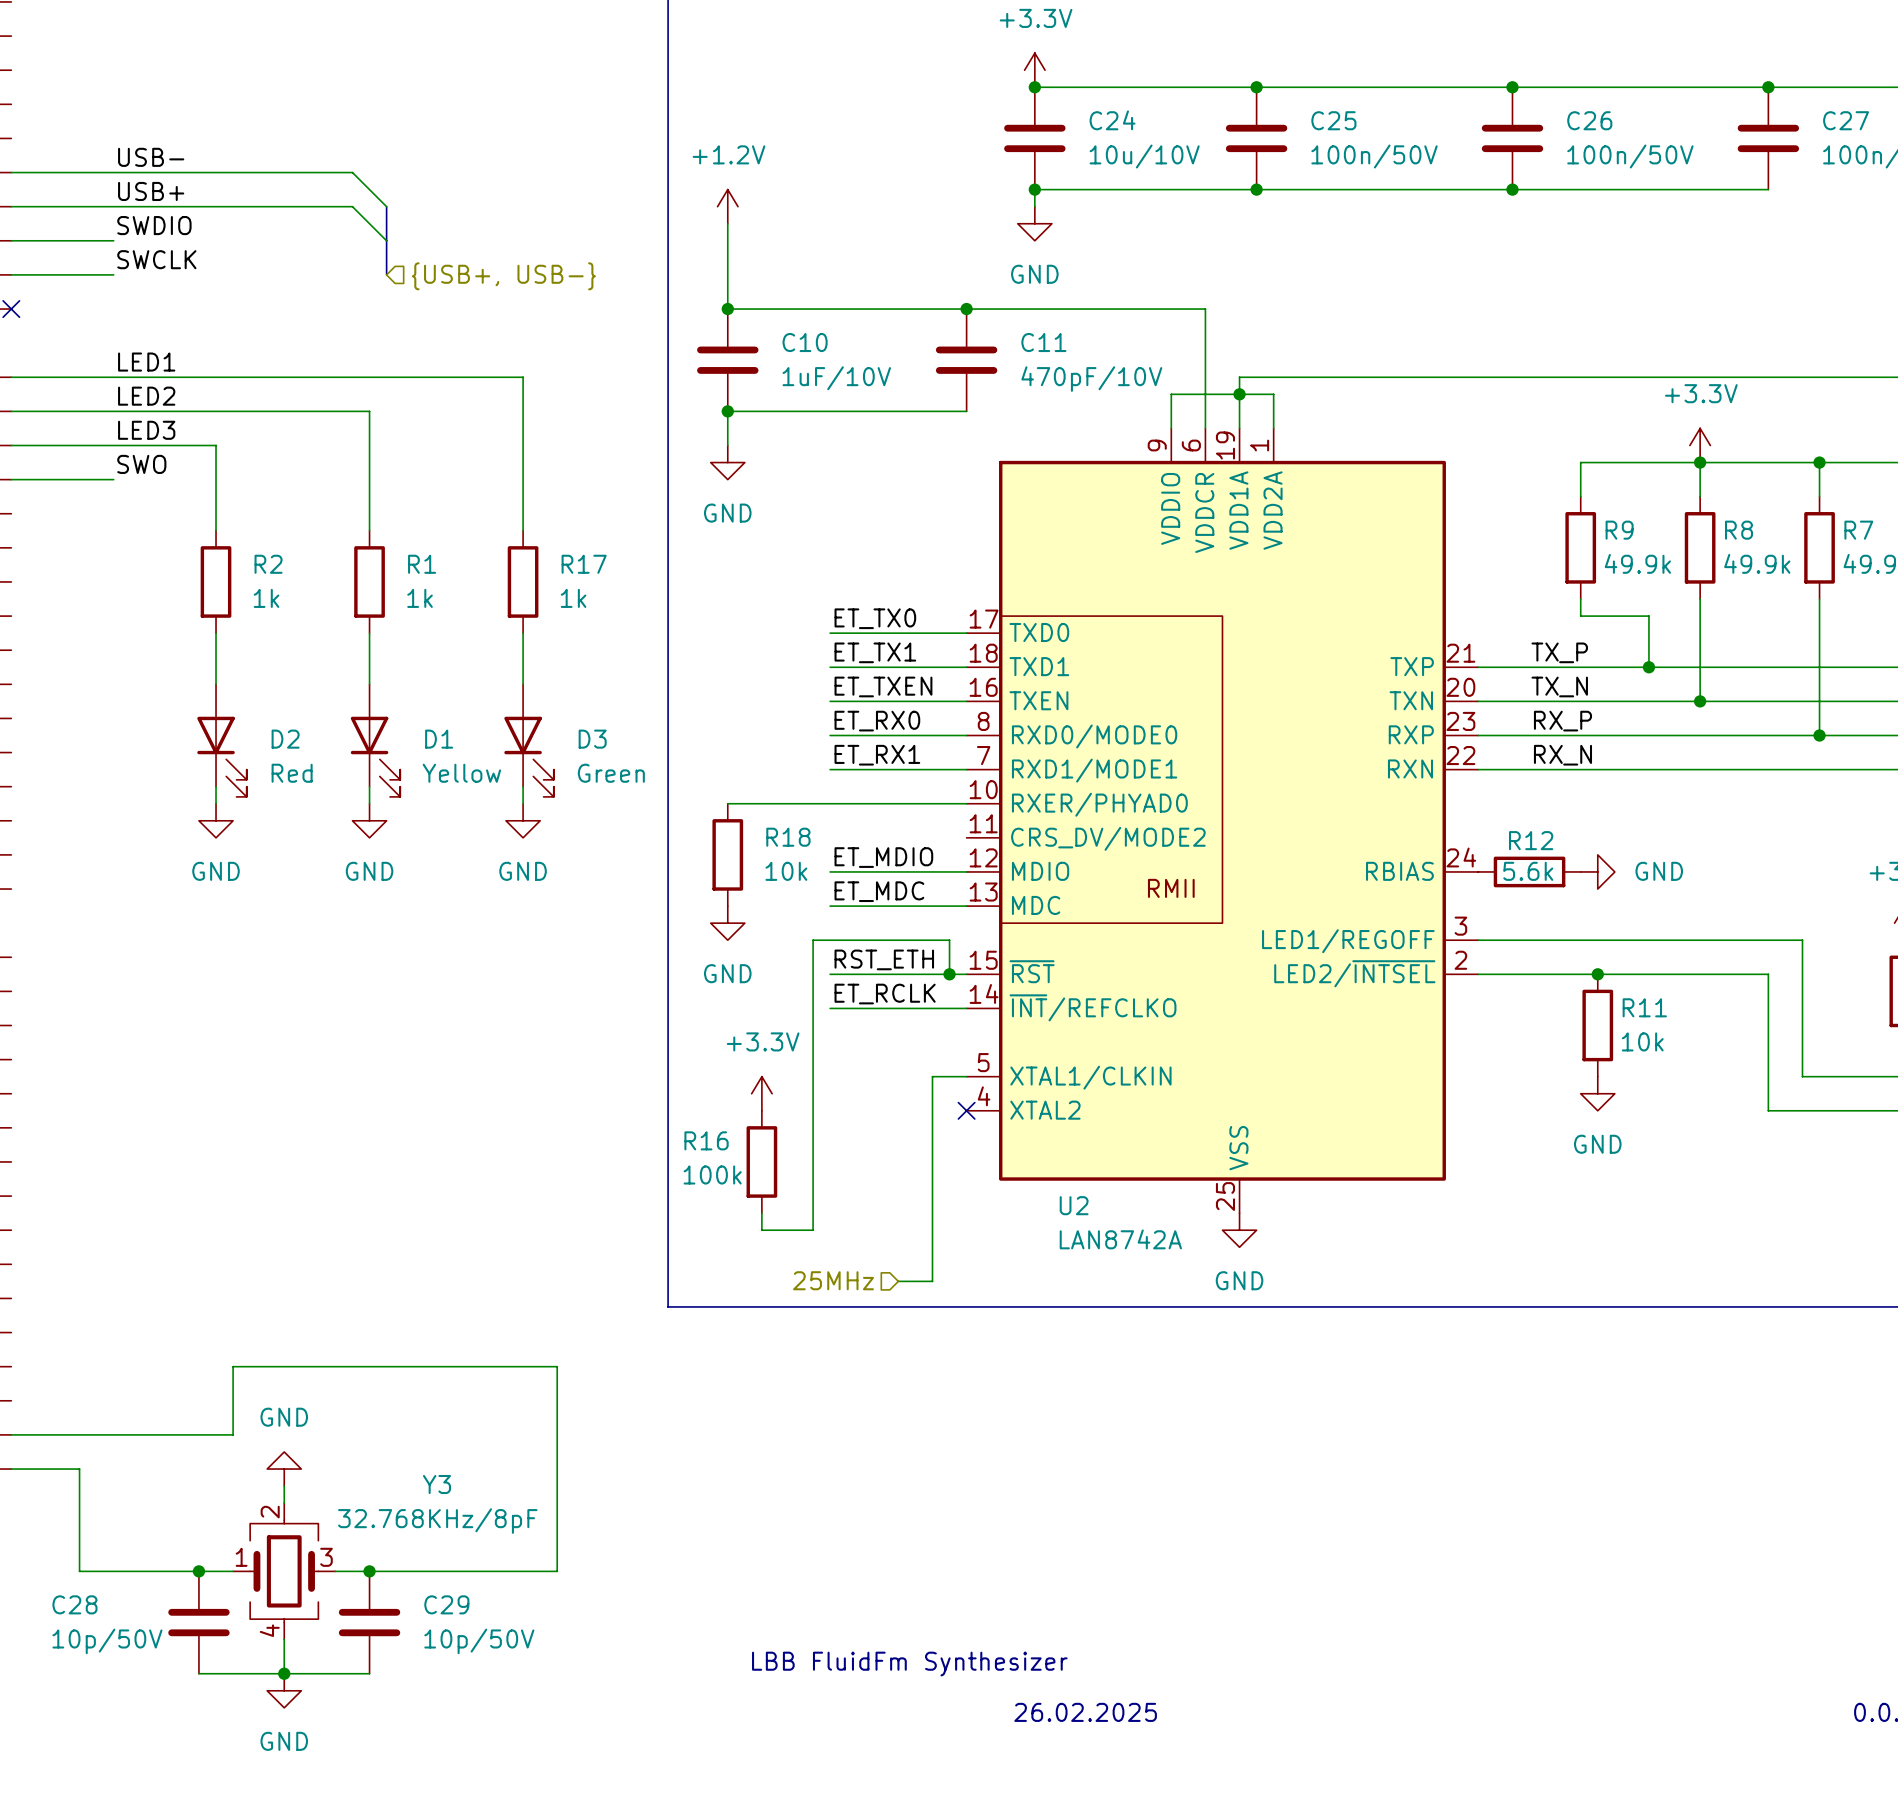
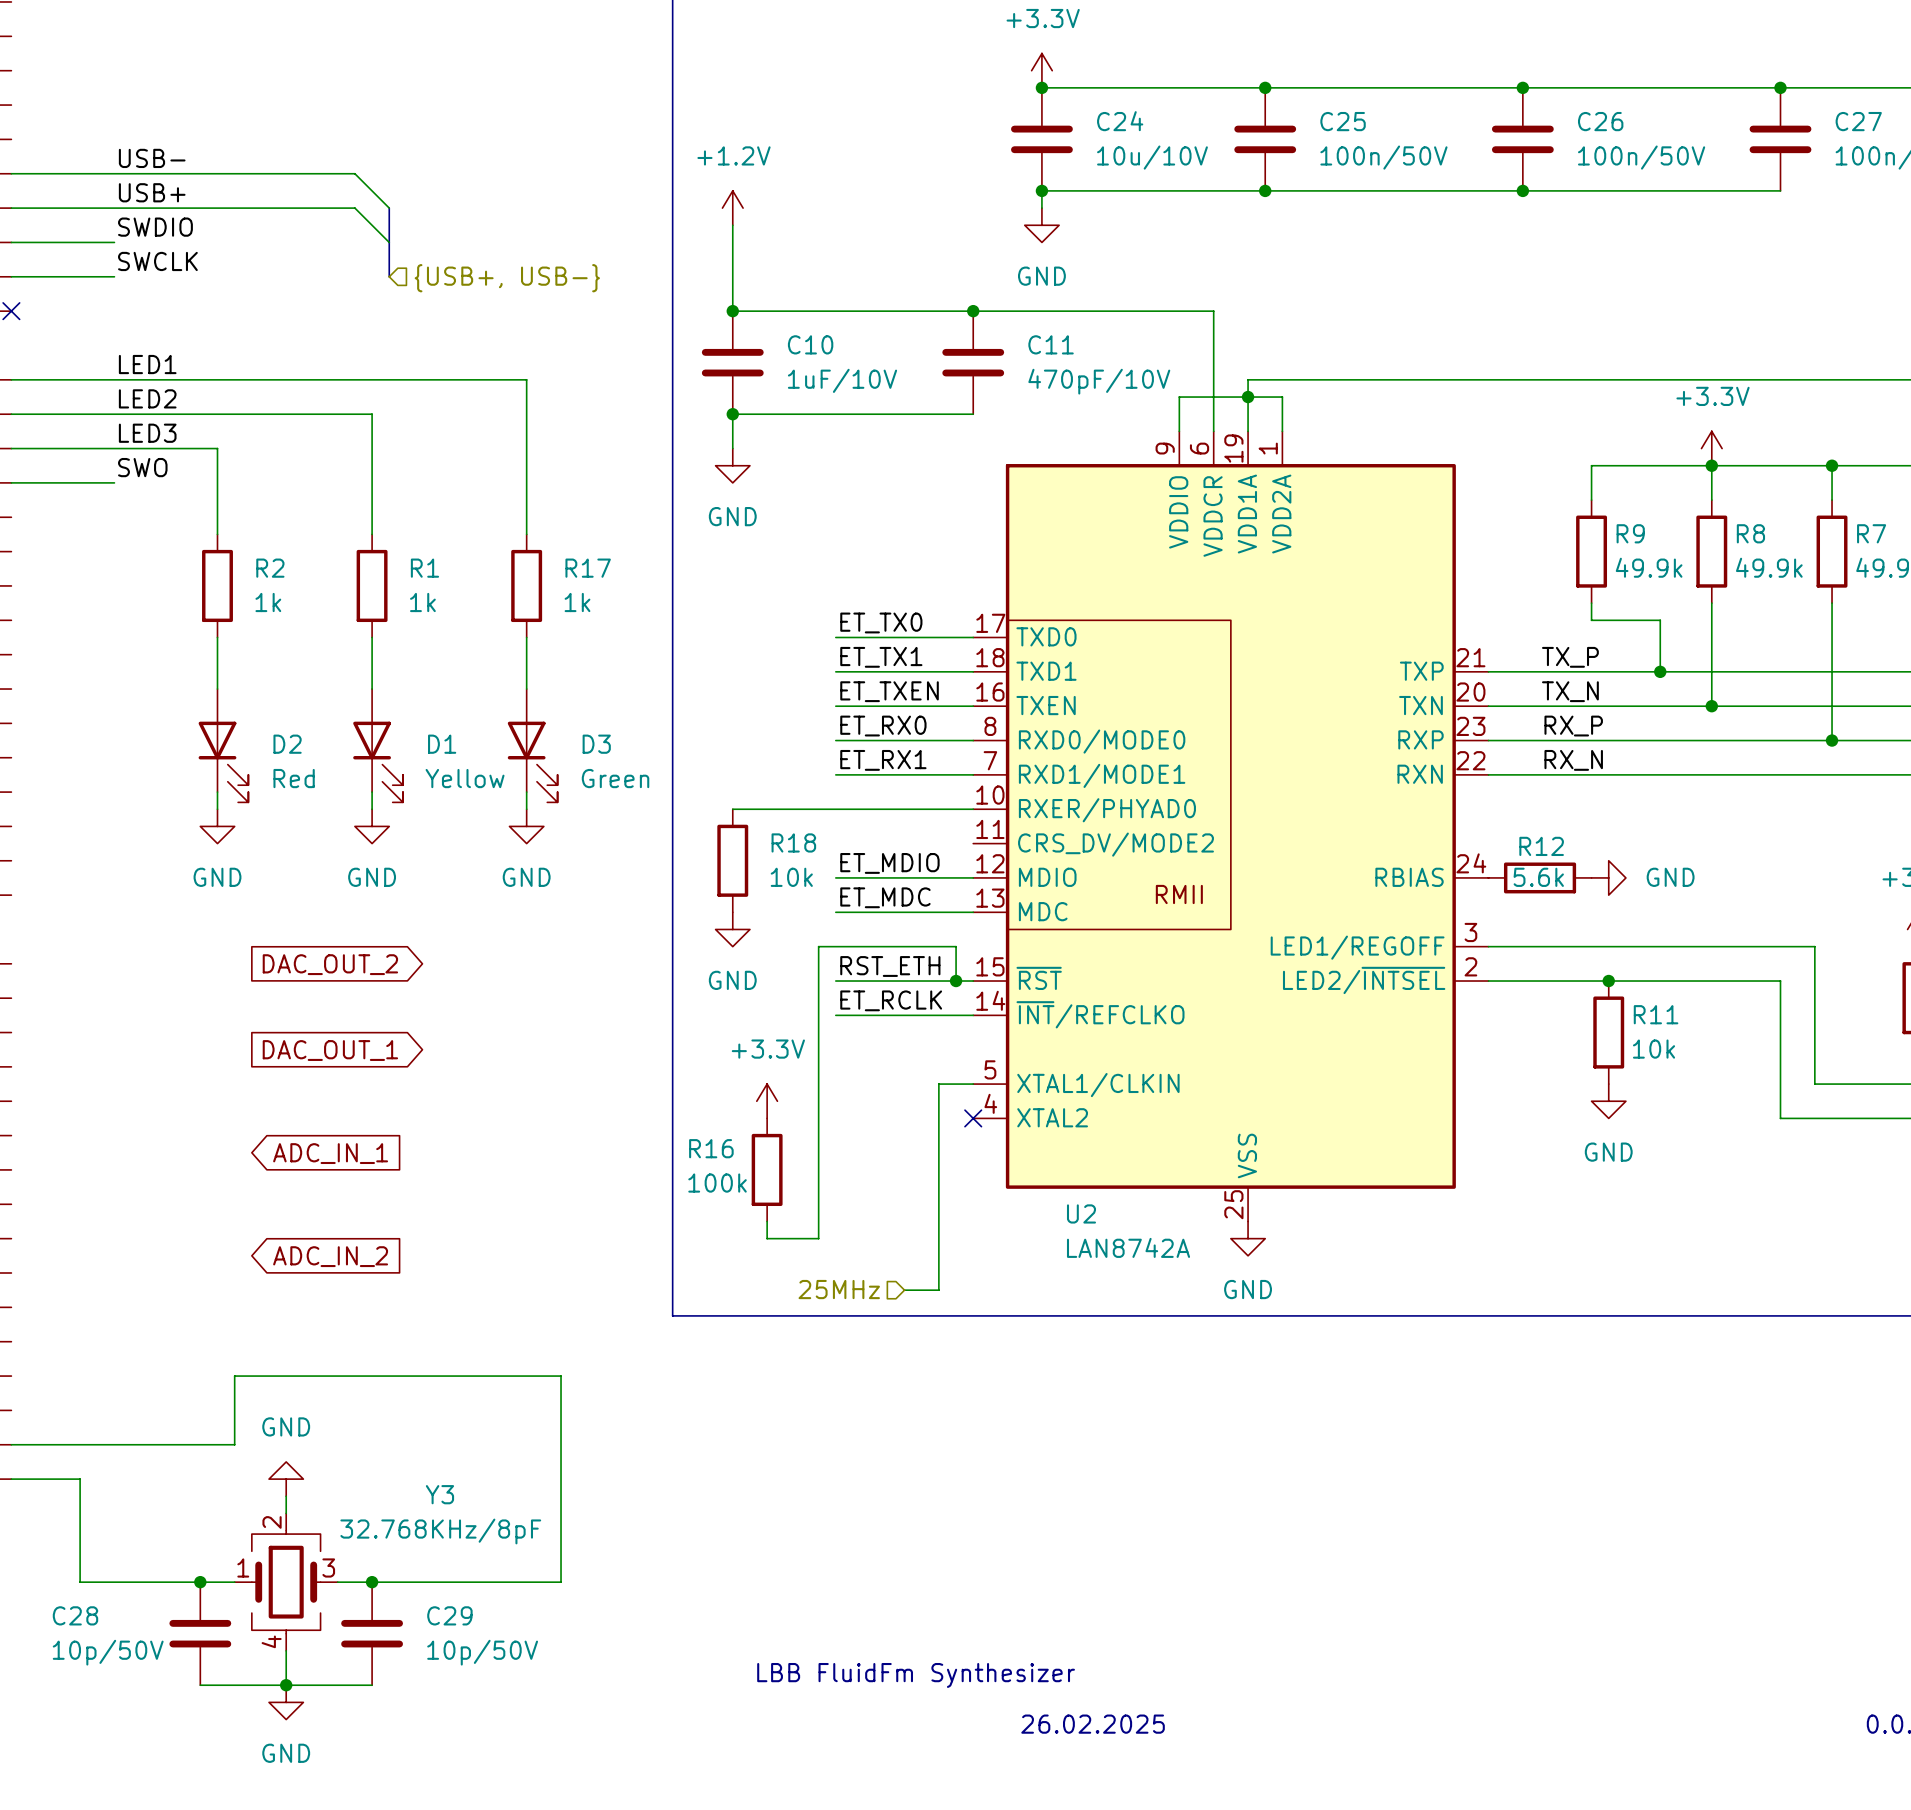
global label: none -> DAC_OUT_2 (330, 964)
global label: none -> DAC_OUT_1 (330, 1050)
global label: none -> ADC_IN_1 (330, 1153)
global label: none -> ADC_IN_2 (330, 1256)

